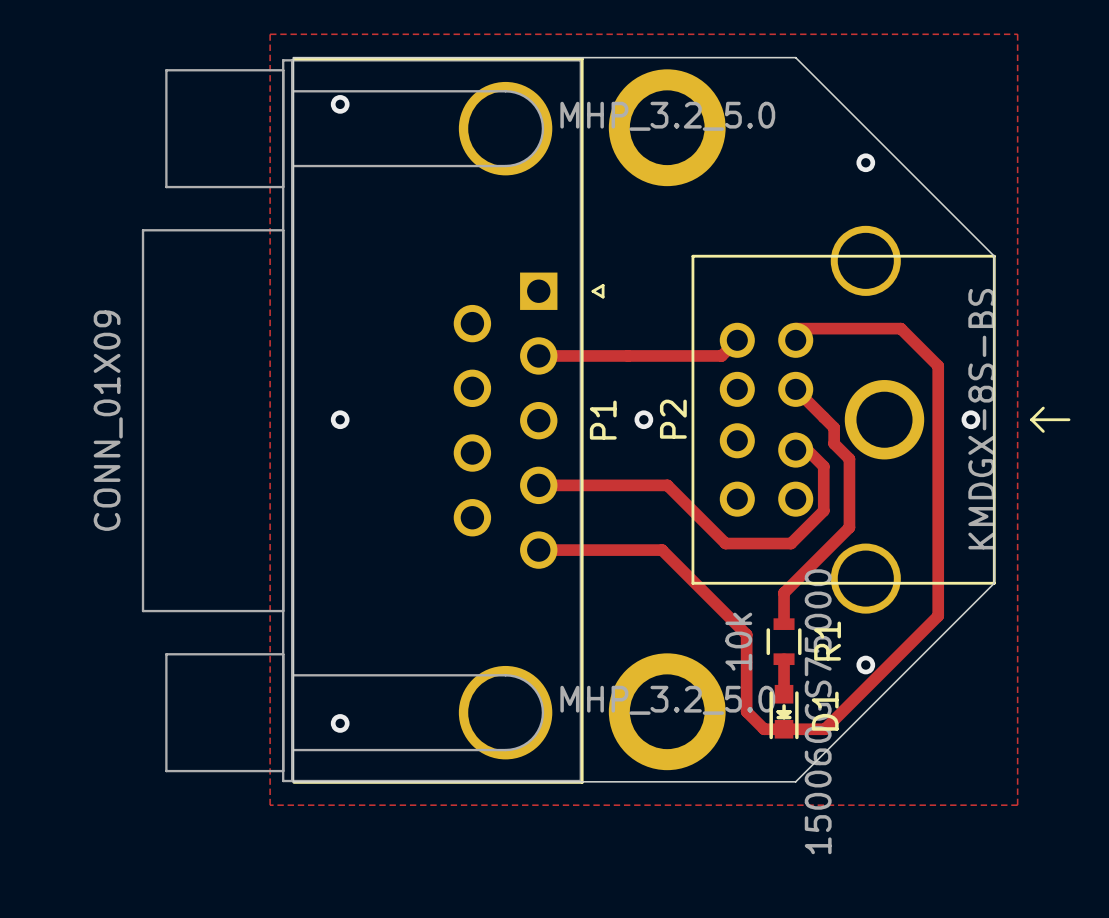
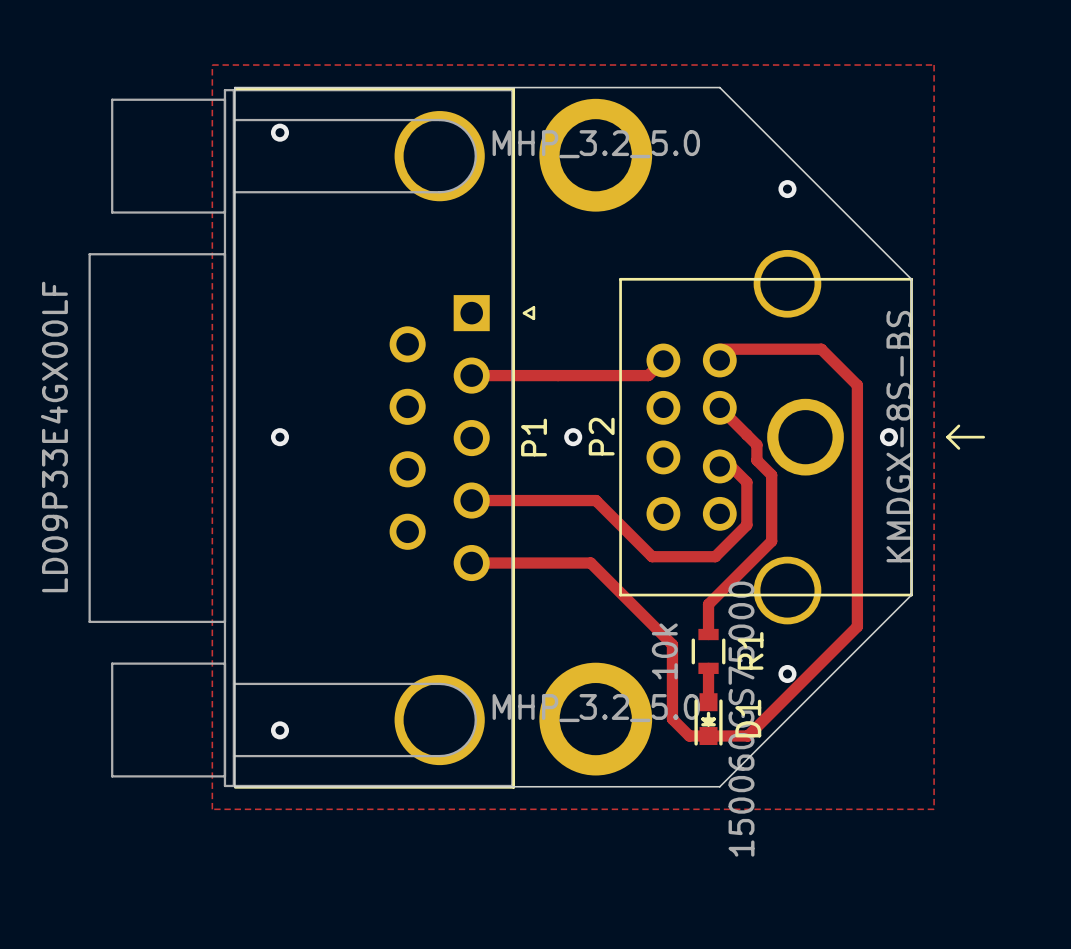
P1 value: CONN_01X09 (108, 420) -> LD09P33E4GX00LF (54, 436)

